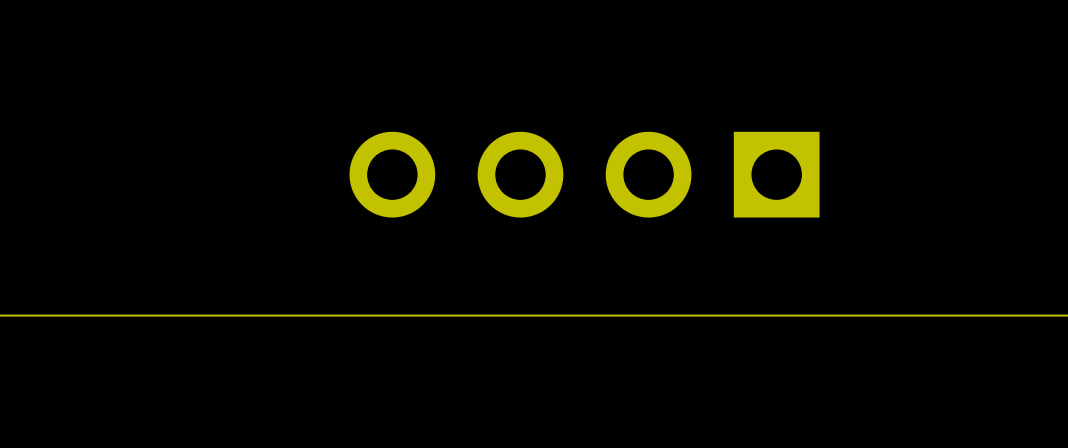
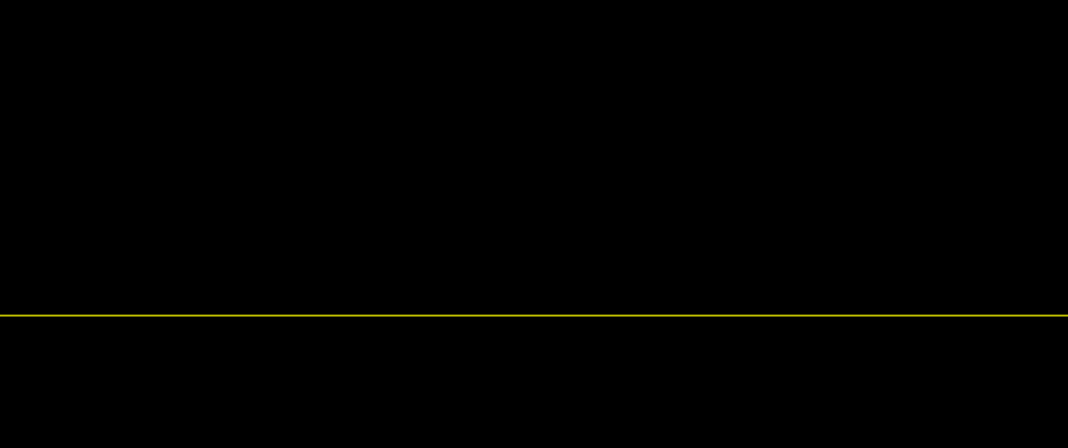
part: (584, 174) -> none

